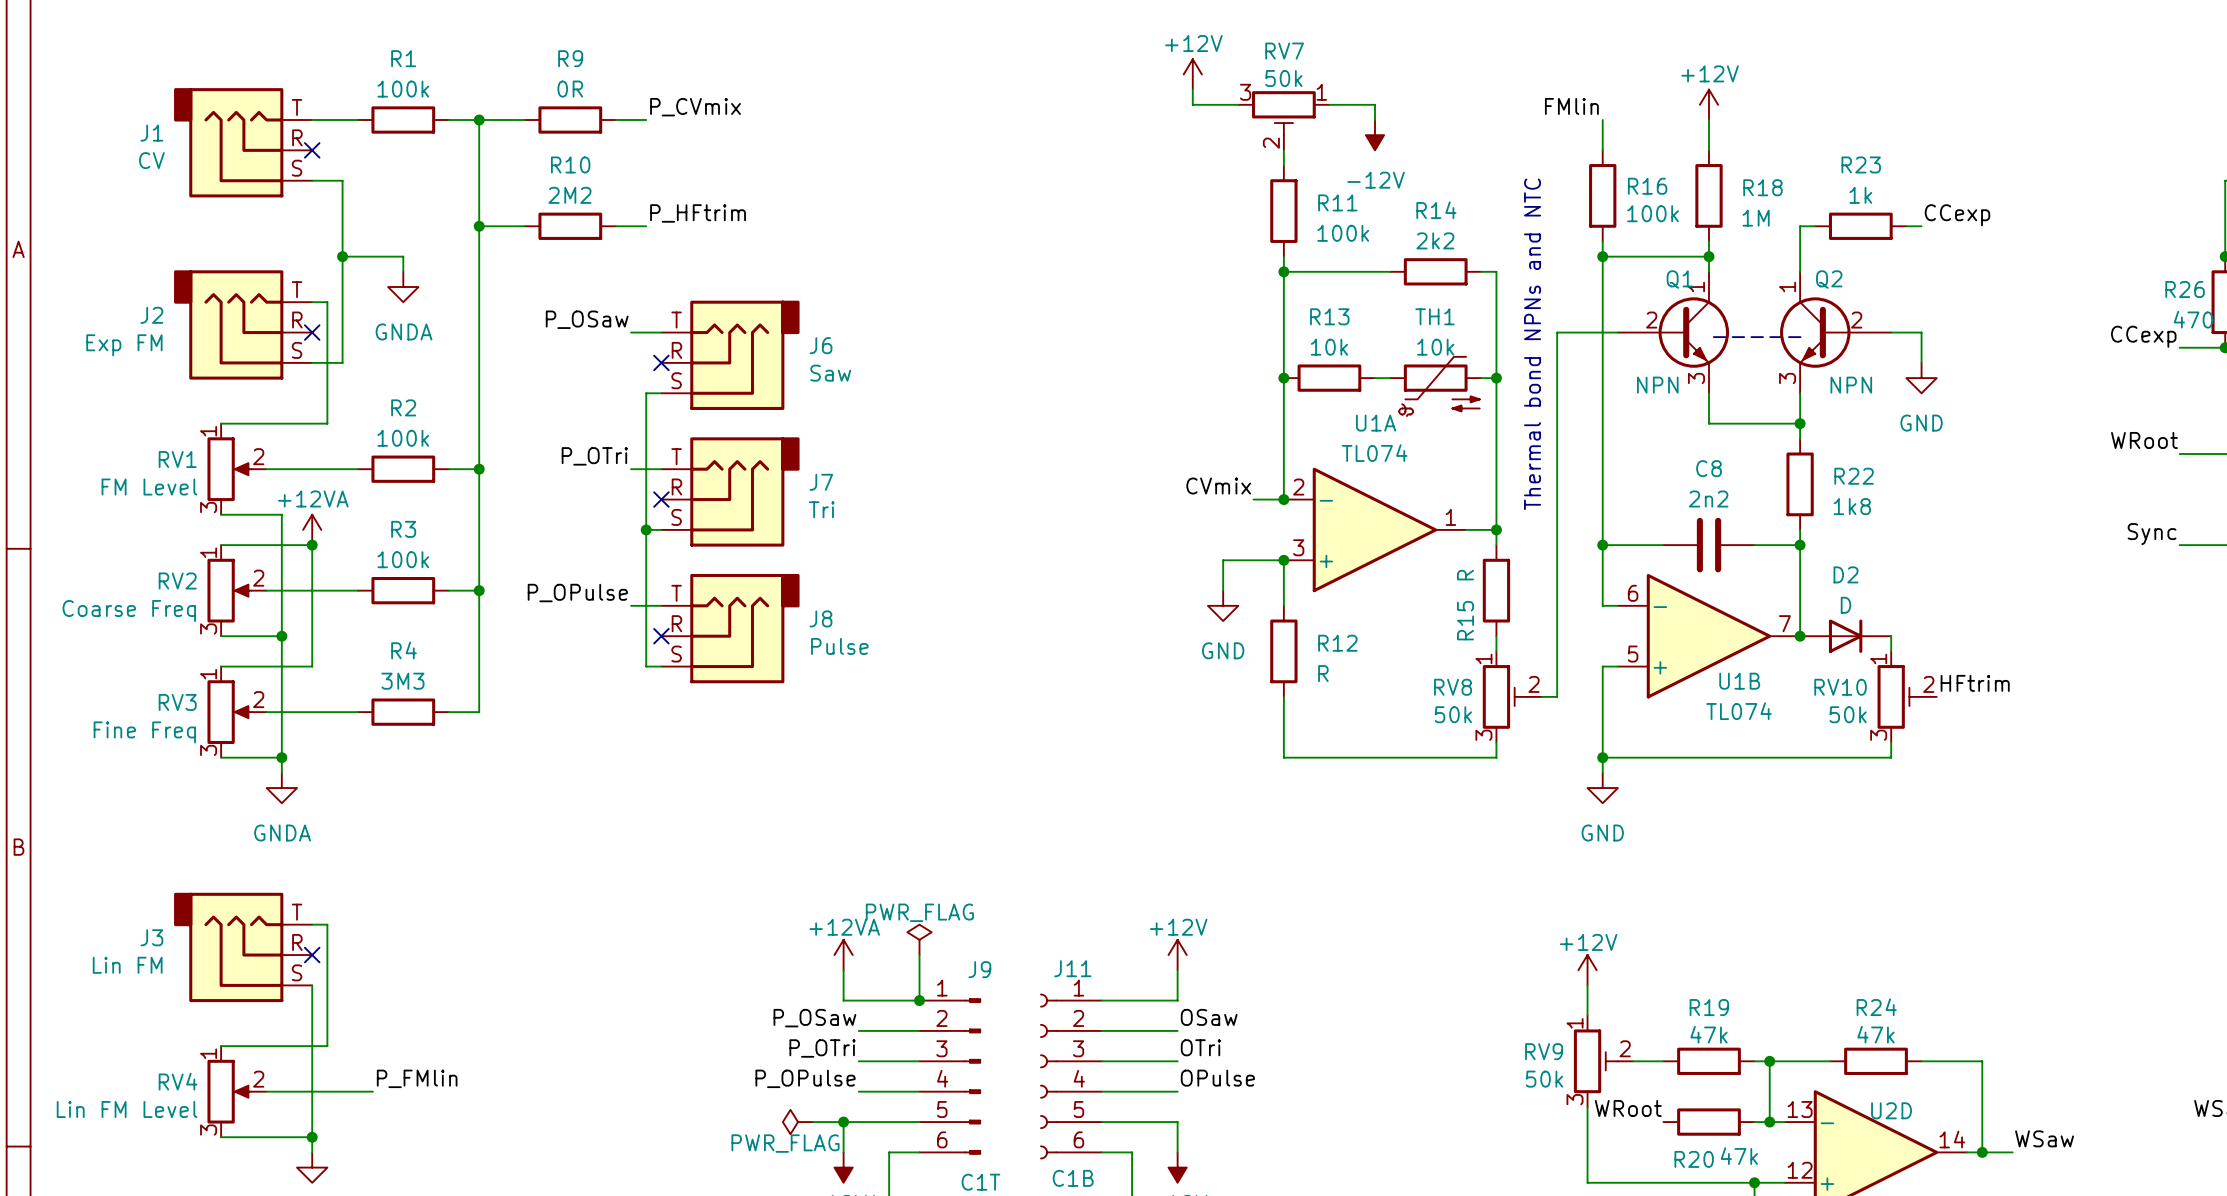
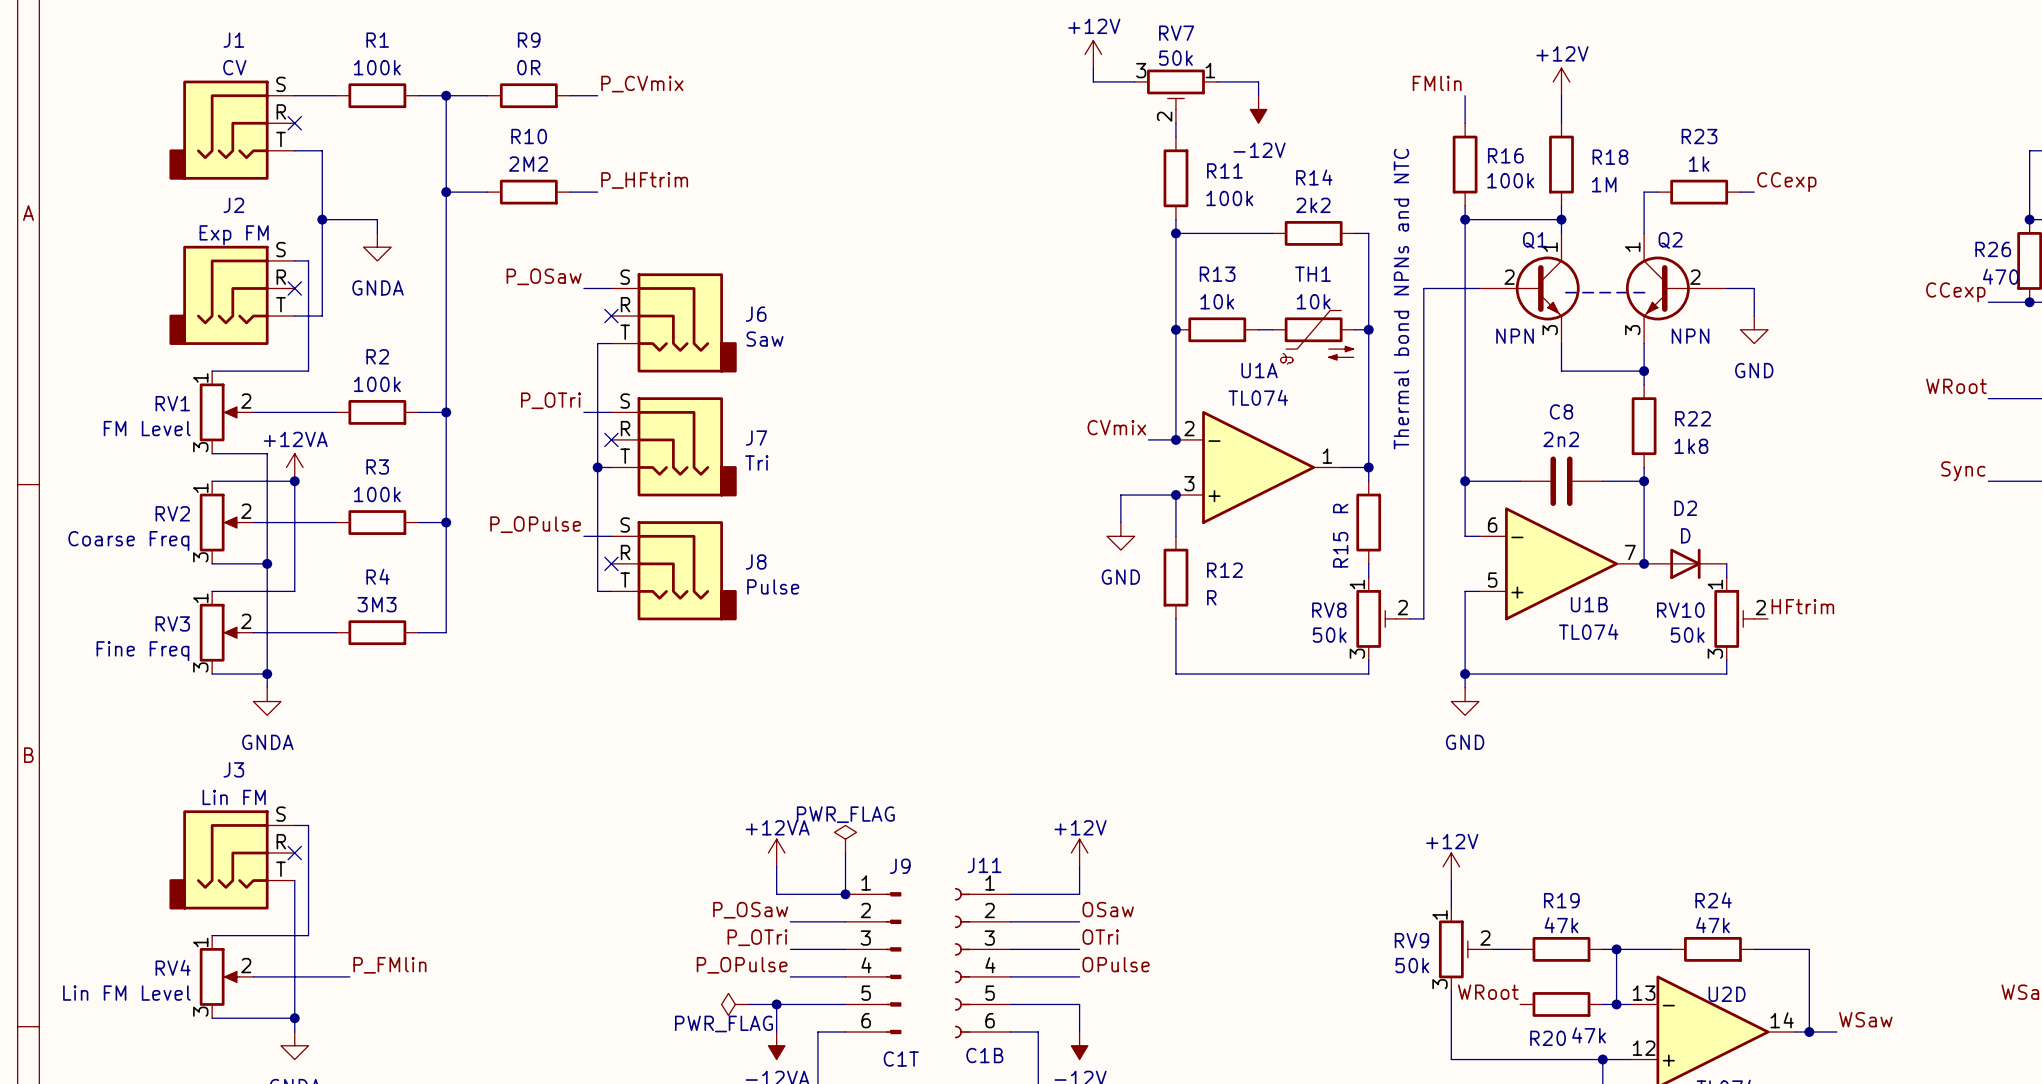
J1 name position: J1 (151, 133) -> J1 (233, 40)
J1 flip: as is (228, 142) -> up-down (219, 130)
J1 value position: CV (151, 160) -> CV (234, 67)
J2 name position: J2 (151, 315) -> J2 (233, 205)
J2 flip: as is (228, 324) -> up-down (219, 295)
J2 value position: Exp FM (124, 345) -> Exp FM (234, 235)
J6 flip: as is (744, 355) -> up-down (687, 322)
J7 flip: as is (744, 491) -> up-down (687, 446)
J8 flip: as is (744, 628) -> up-down (687, 570)
J3 name position: J3 (151, 937) -> J3 (233, 769)
J3 flip: as is (228, 947) -> up-down (219, 859)
J3 value position: Lin FM (127, 965) -> Lin FM (234, 797)

